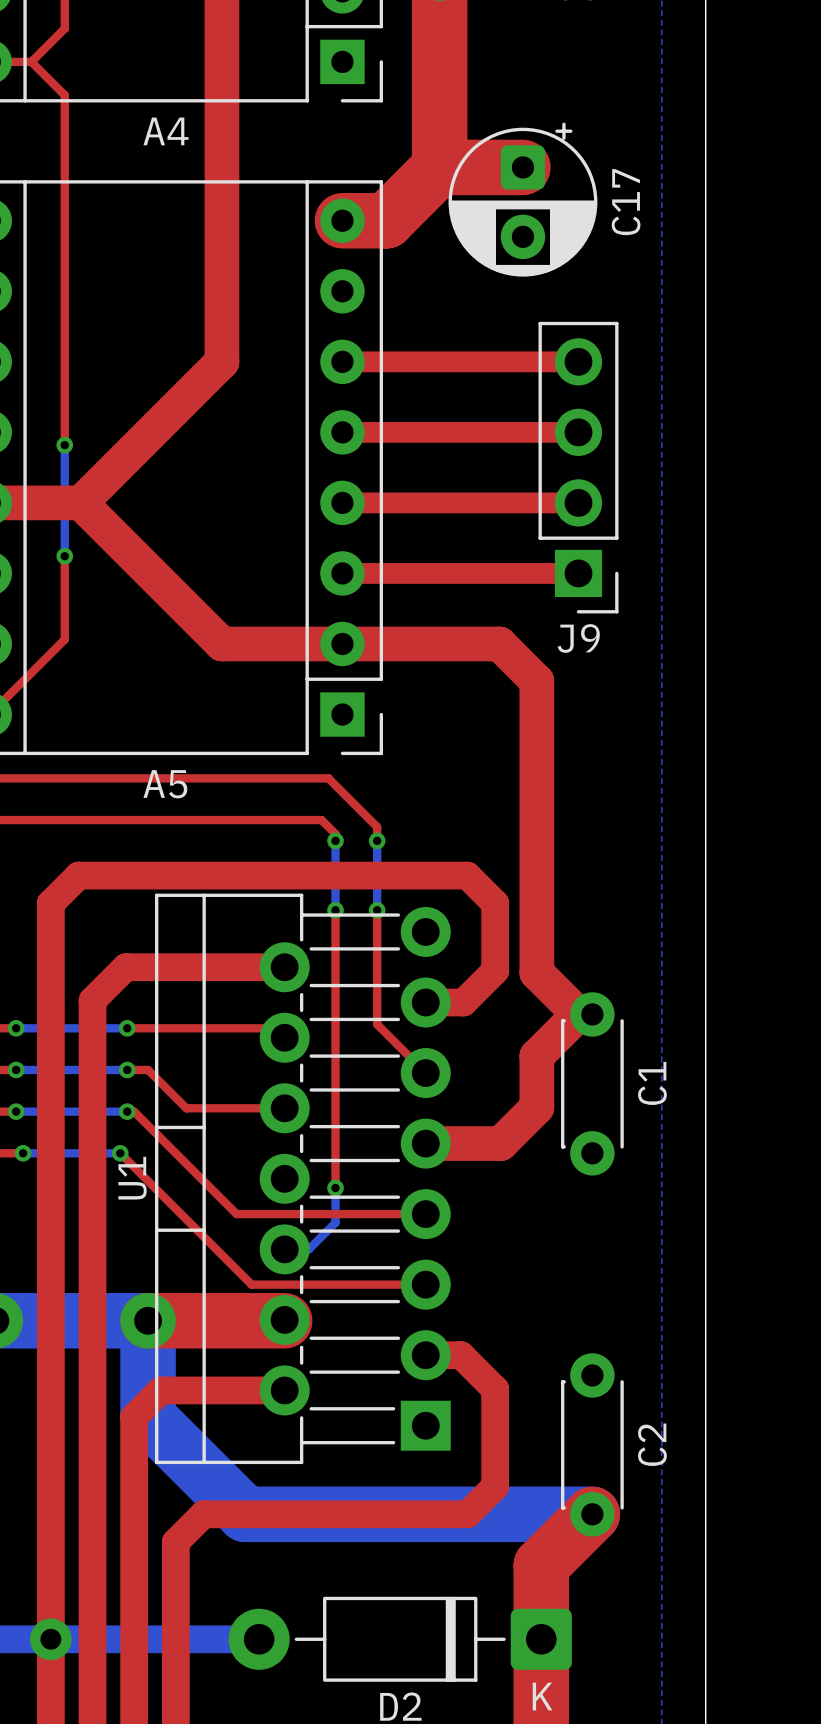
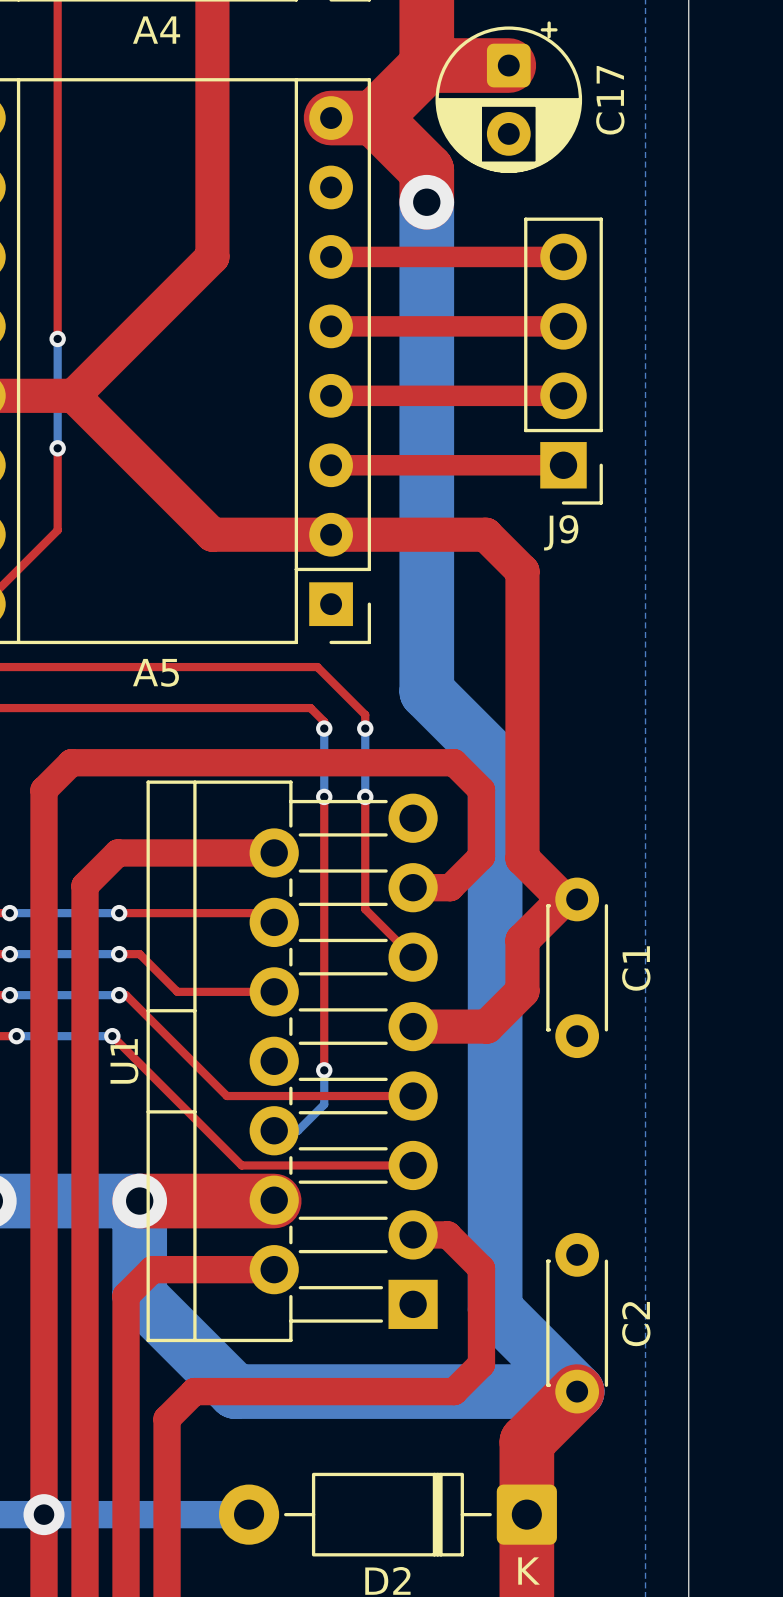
top track: none -> (374, 118) (426, 170) (426, 202)
bottom track: none -> (426, 202) (426, 691) (495, 759) (495, 1309) (577, 1391)
via: none -> (426, 202)

